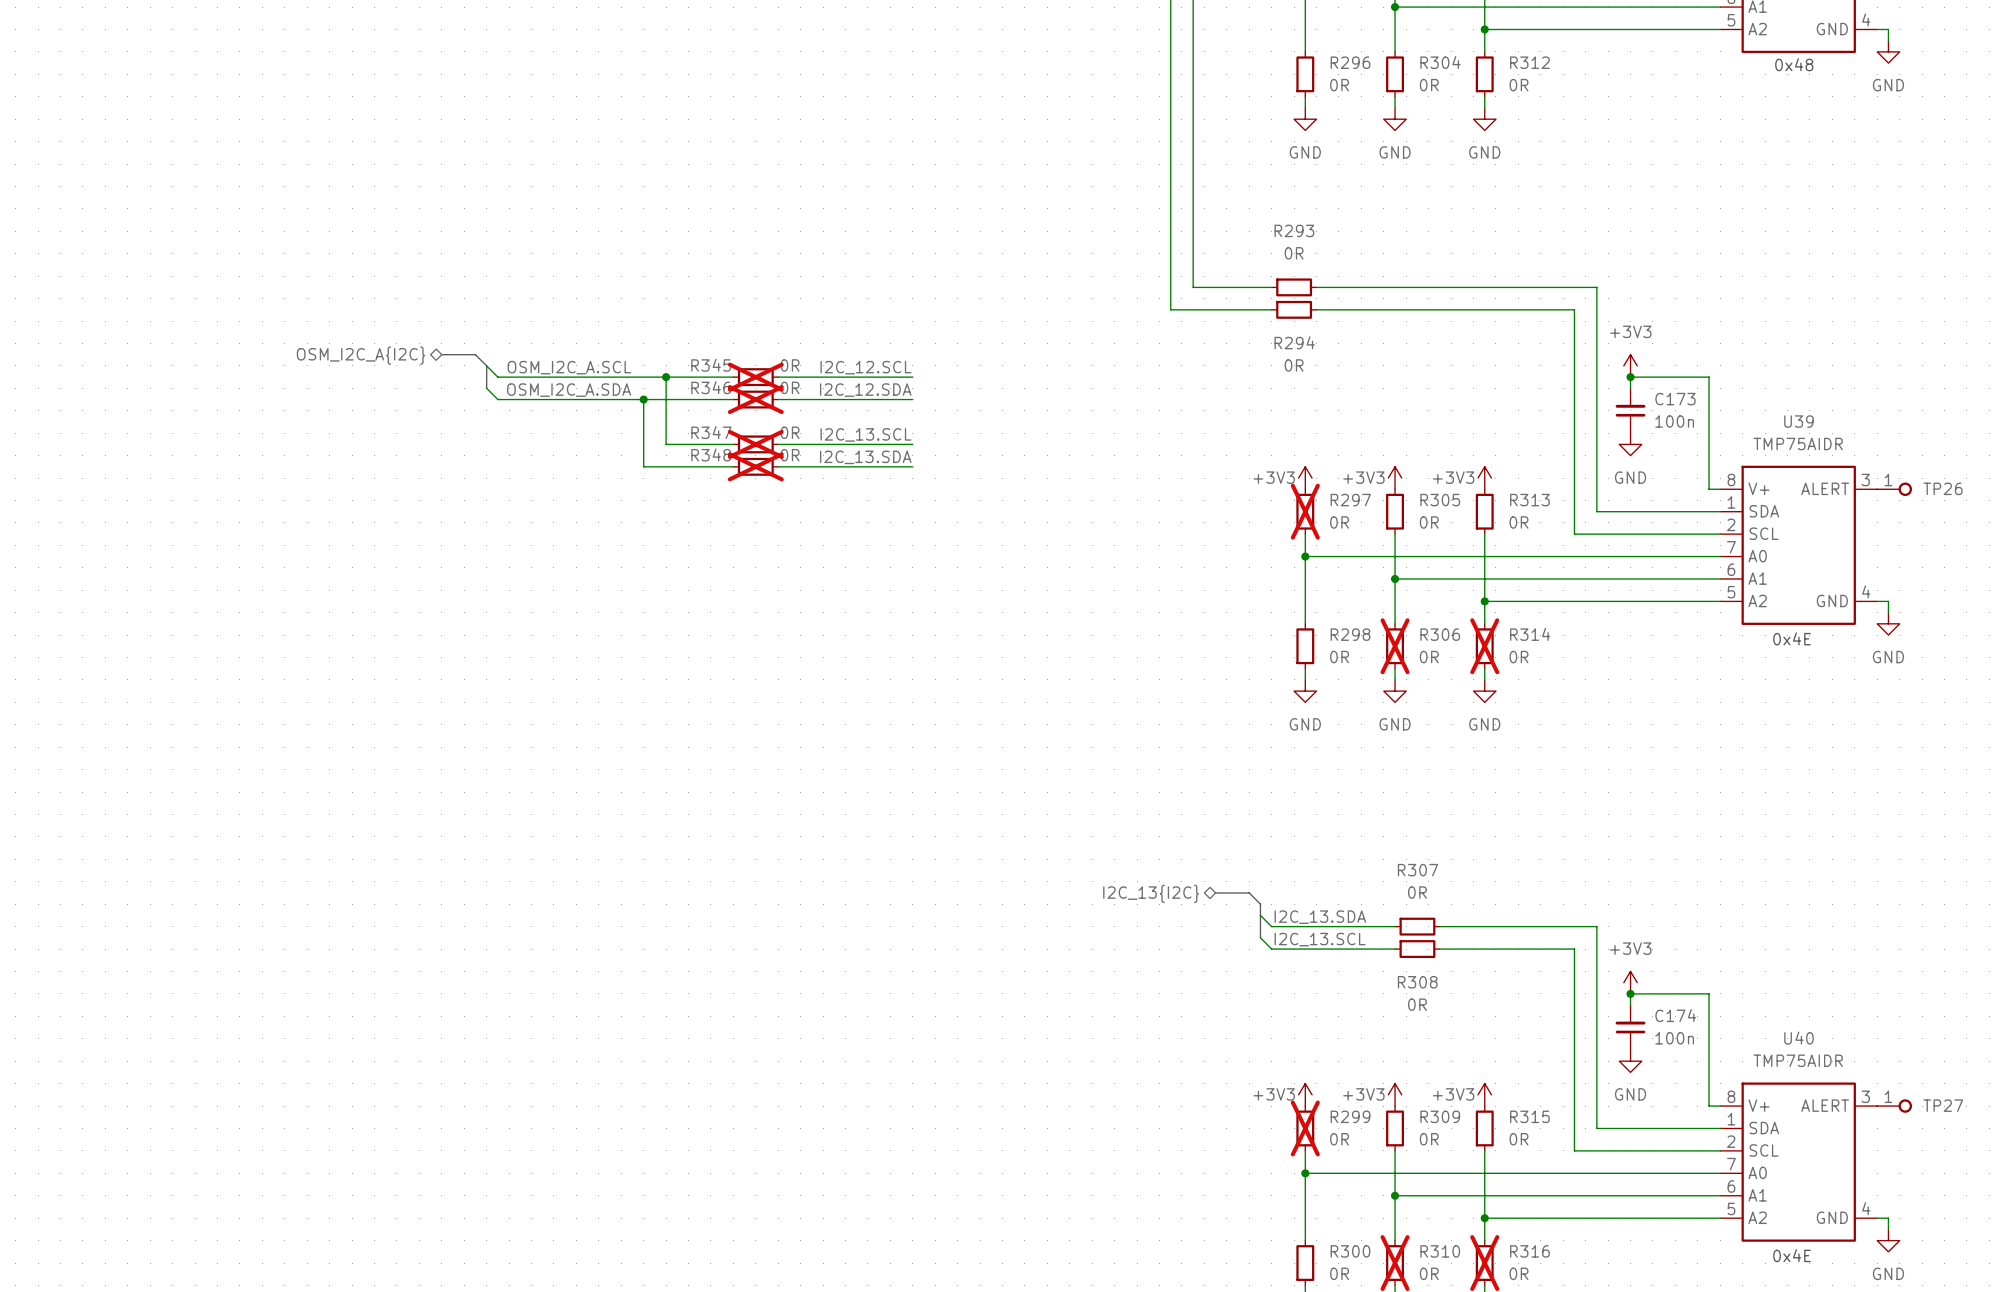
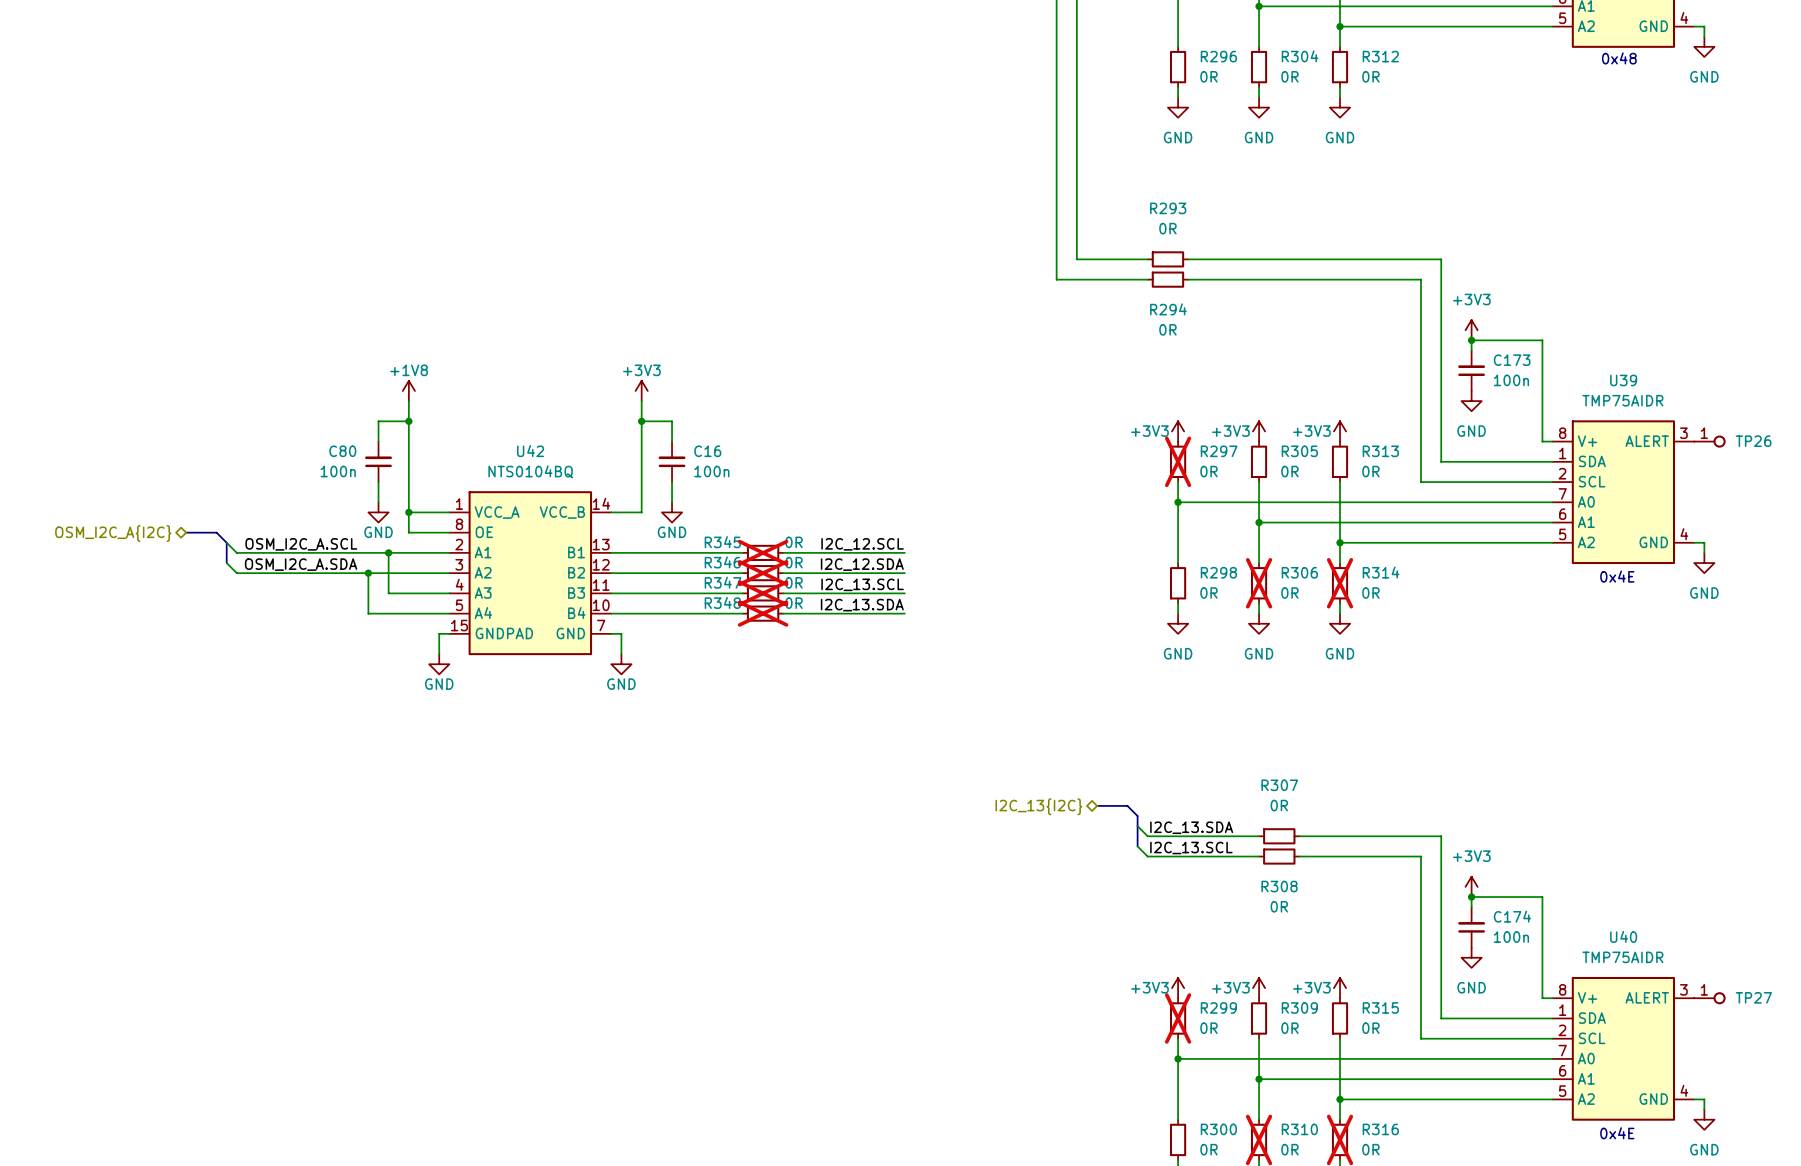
bus: (441, 354) (475, 354) (486, 365) (486, 388) -> none
hierarchical label: OSM_I2C_A{I2C} (361, 355) -> none
wire: (486, 365) (497, 377) (733, 377) -> none
label: OSM_I2C_A.SCL (569, 367) -> none
label: I2C_12.SCL (866, 367) -> none
wire: (666, 377) (666, 444) (733, 444) -> none
junction: (666, 377) -> none
R345 position: (755, 377) -> (763, 552)
wire: (778, 377) (912, 377) -> none
wire: (486, 388) (497, 399) (733, 399) -> none
label: OSM_I2C_A.SDA (569, 390) -> none
label: I2C_12.SDA (865, 390) -> none
wire: (643, 399) (643, 466) (710, 466) -> none
junction: (643, 399) -> none
R346 position: (755, 399) -> (763, 573)
wire: (778, 399) (912, 399) -> none
power symbol: none -> +1V8 (408, 390)
power symbol: none -> +3V3 (641, 390)
label: I2C_13.SCL (866, 434) -> none
wire: none -> (408, 401) (408, 532) (449, 532)
wire: none -> (641, 401) (641, 512) (611, 512)
R347 position: (755, 444) -> (763, 593)
wire: (778, 444) (912, 444) -> (783, 552) (904, 552)
label: I2C_13.SDA (865, 457) -> none
wire: none -> (408, 421) (378, 421) (378, 441)
junction: none -> (408, 421)
junction: none -> (641, 421)
wire: none -> (661, 421) (672, 421) (672, 441)
R348 position: (755, 466) -> (763, 613)
wire: (778, 466) (912, 466) -> (783, 573) (904, 573)
C80: none -> (378, 461)
C16: none -> (672, 461)
wire: none -> (378, 482) (378, 502)
wire: none -> (672, 482) (672, 502)
power symbol: none -> GND (378, 512)
wire: none -> (408, 512) (449, 512)
junction: none -> (408, 512)
power symbol: none -> GND (672, 512)
bus: none -> (186, 532) (216, 532) (226, 542) (226, 563)
hierarchical label: none -> OSM_I2C_A{I2C} (113, 533)
wire: none -> (226, 542) (236, 552) (449, 552)
label: none -> OSM_I2C_A.SCL (301, 544)
label: none -> I2C_12.SCL (862, 544)
wire: none -> (388, 552) (388, 593) (449, 593)
junction: none -> (388, 552)
wire: none -> (611, 552) (742, 552)
wire: none -> (226, 563) (236, 573) (449, 573)
label: none -> OSM_I2C_A.SDA (301, 564)
label: none -> I2C_12.SDA (862, 564)
wire: none -> (368, 573) (368, 613) (449, 613)
junction: none -> (368, 573)
U42: none -> (530, 573)
wire: none -> (611, 573) (742, 573)
label: none -> I2C_13.SCL (862, 584)
wire: none -> (611, 593) (742, 593)
wire: none -> (783, 593) (904, 593)
label: none -> I2C_13.SDA (862, 605)
wire: none -> (611, 613) (742, 613)
wire: none -> (783, 613) (904, 613)
wire: none -> (449, 633) (439, 633) (439, 654)
wire: none -> (611, 633) (621, 633) (621, 654)
power symbol: none -> GND (439, 664)
power symbol: none -> GND (621, 664)

